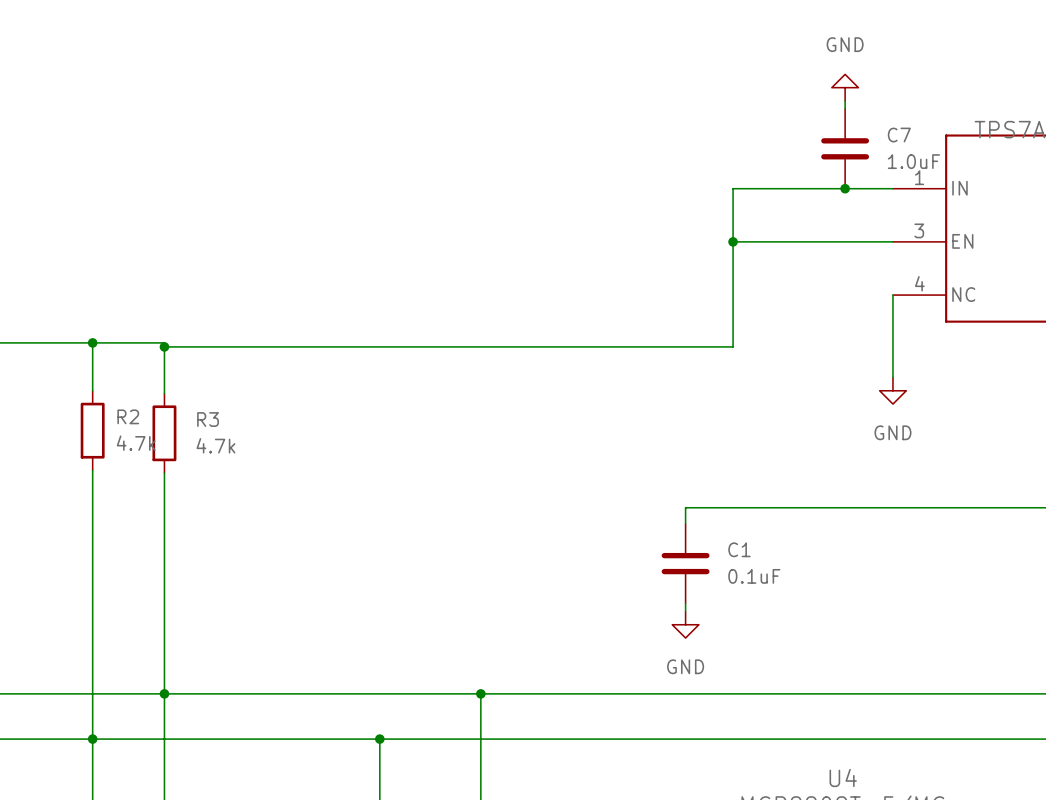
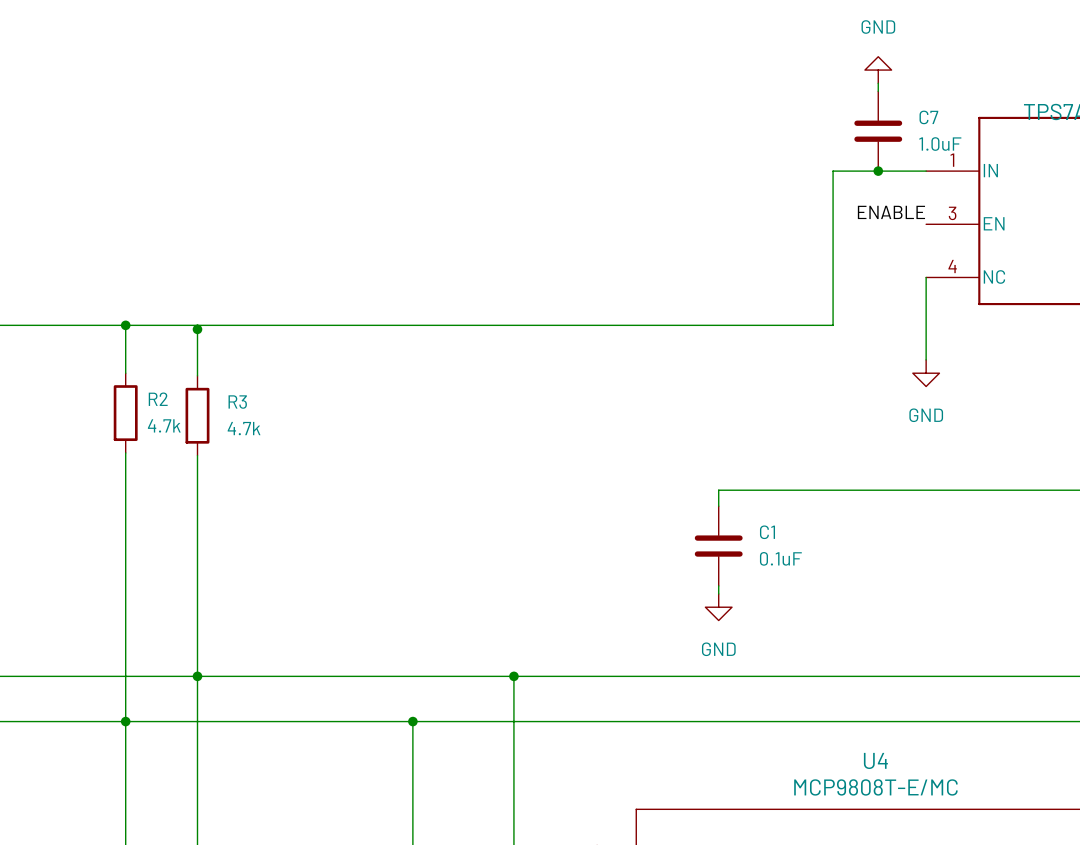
wire: (799, 188) (733, 188) (733, 346) (164, 346) -> (833, 171) (833, 325) (197, 325)
label: none -> ENABLE (891, 212)
wire: (733, 241) (892, 241) -> none
junction: (733, 241) -> none

